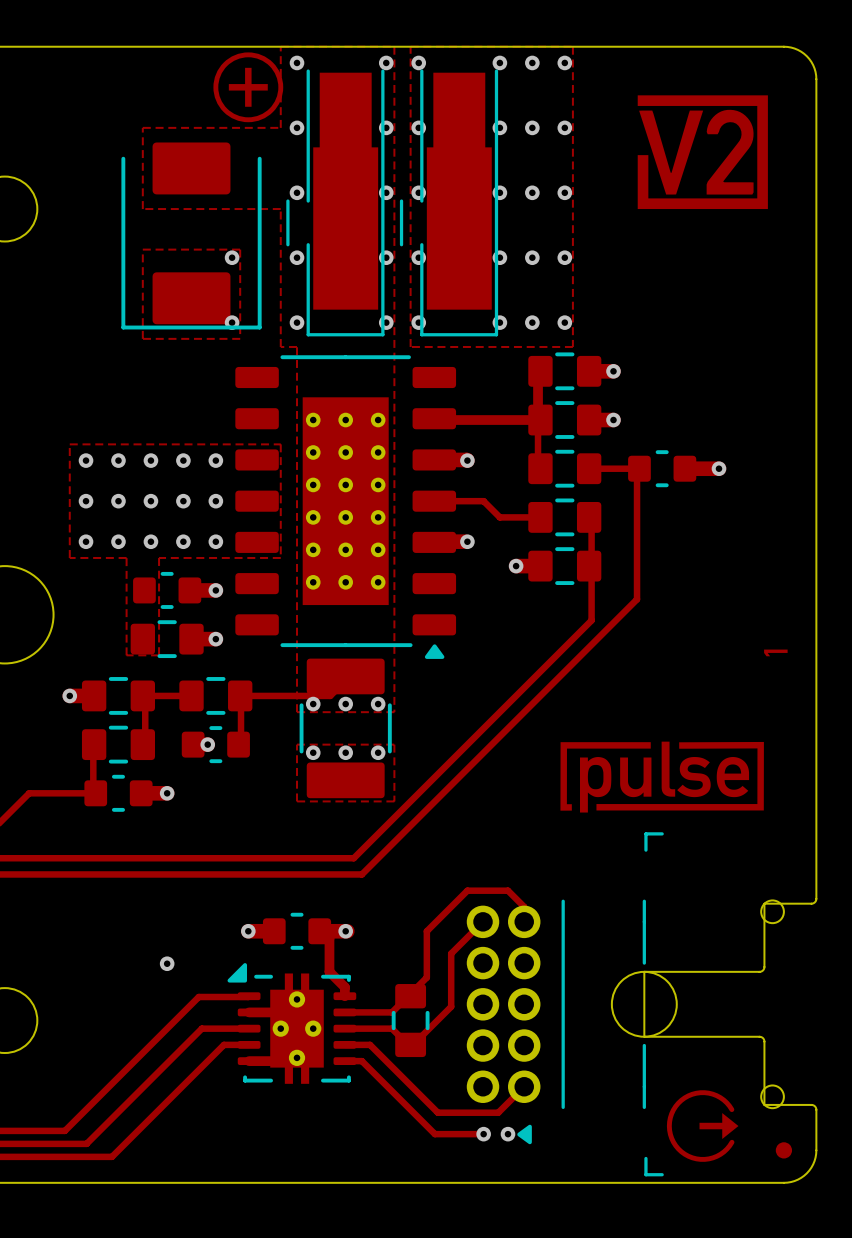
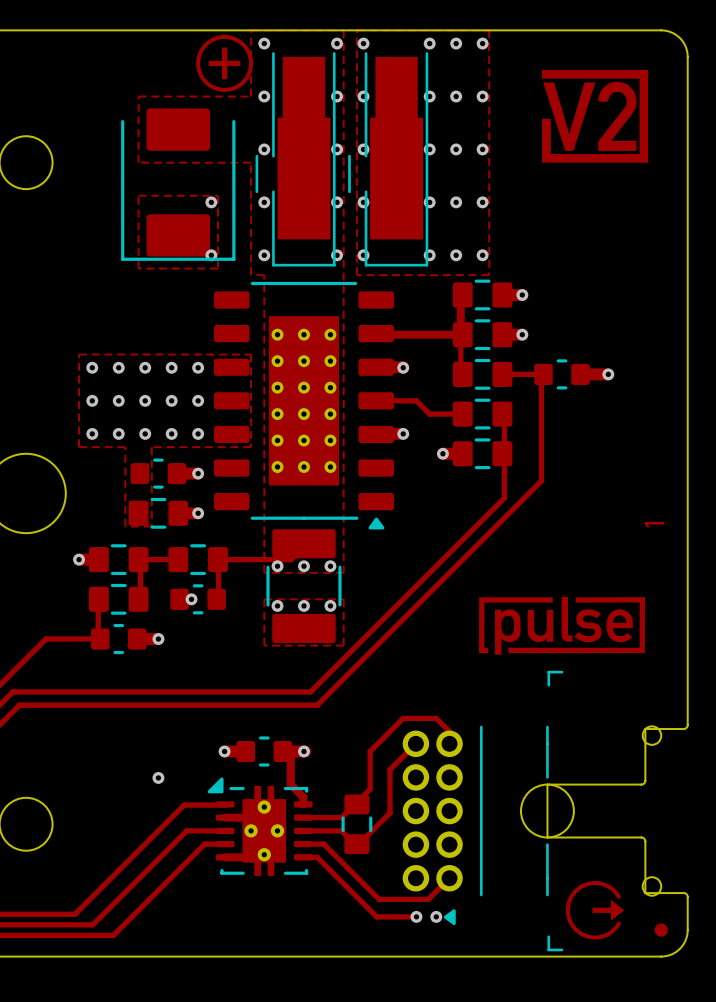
part footprint: [286, 69, 385, 337] -> [255, 52, 336, 267]
part footprint: [399, 69, 499, 337] -> [348, 52, 429, 267]

